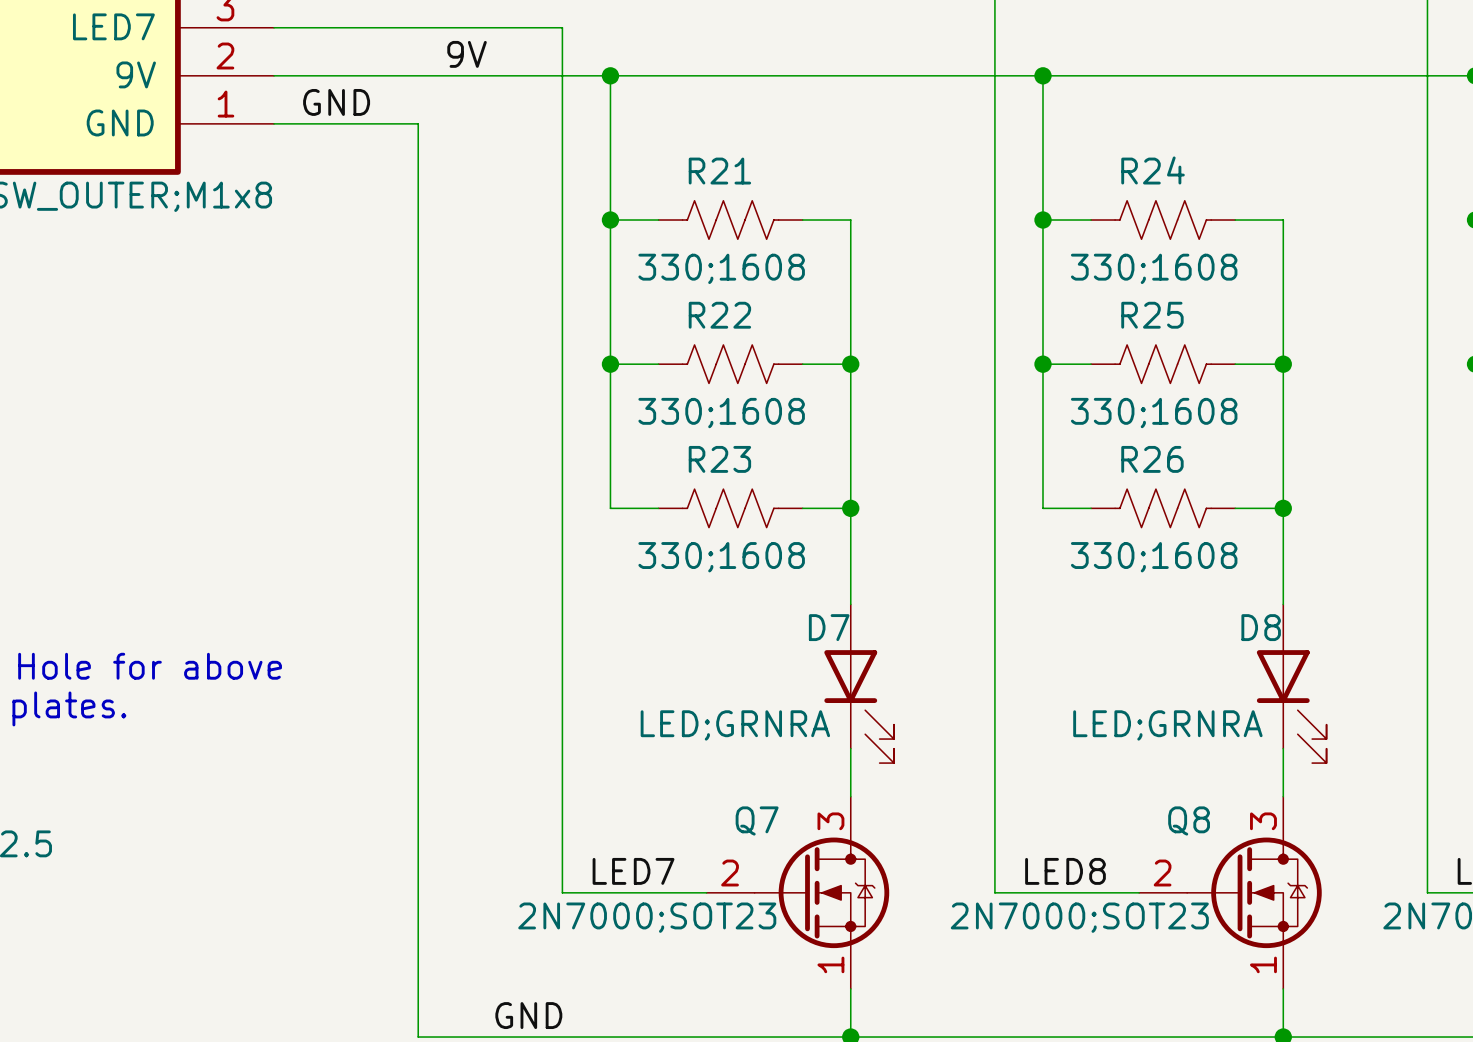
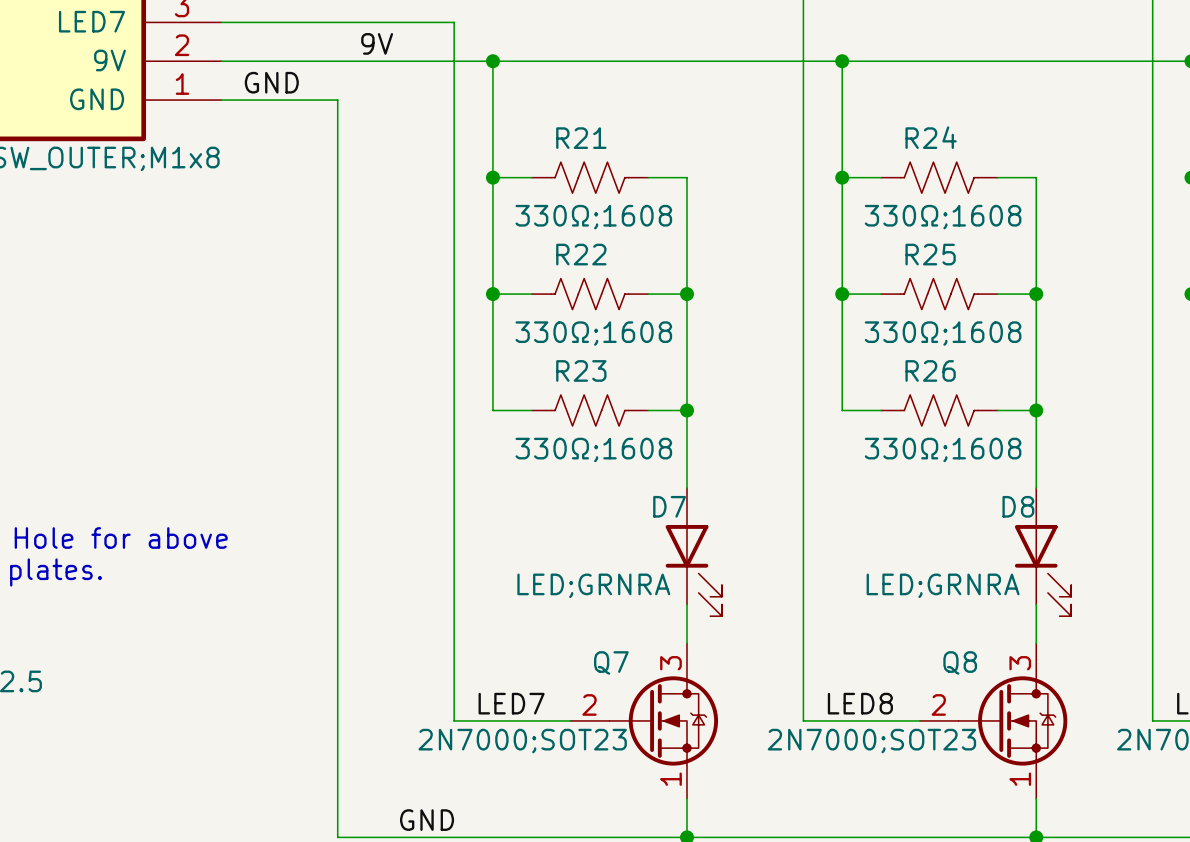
R21 value: 330;1608 (721, 268) -> 330Ω;1608 (593, 217)
R24 value: 330;1608 (1154, 268) -> 330Ω;1608 (943, 217)
R22 value: 330;1608 (721, 413) -> 330Ω;1608 (593, 333)
R25 value: 330;1608 (1154, 413) -> 330Ω;1608 (943, 333)
R23 value: 330;1608 (721, 557) -> 330Ω;1608 (593, 449)
R26 value: 330;1608 (1154, 557) -> 330Ω;1608 (943, 449)

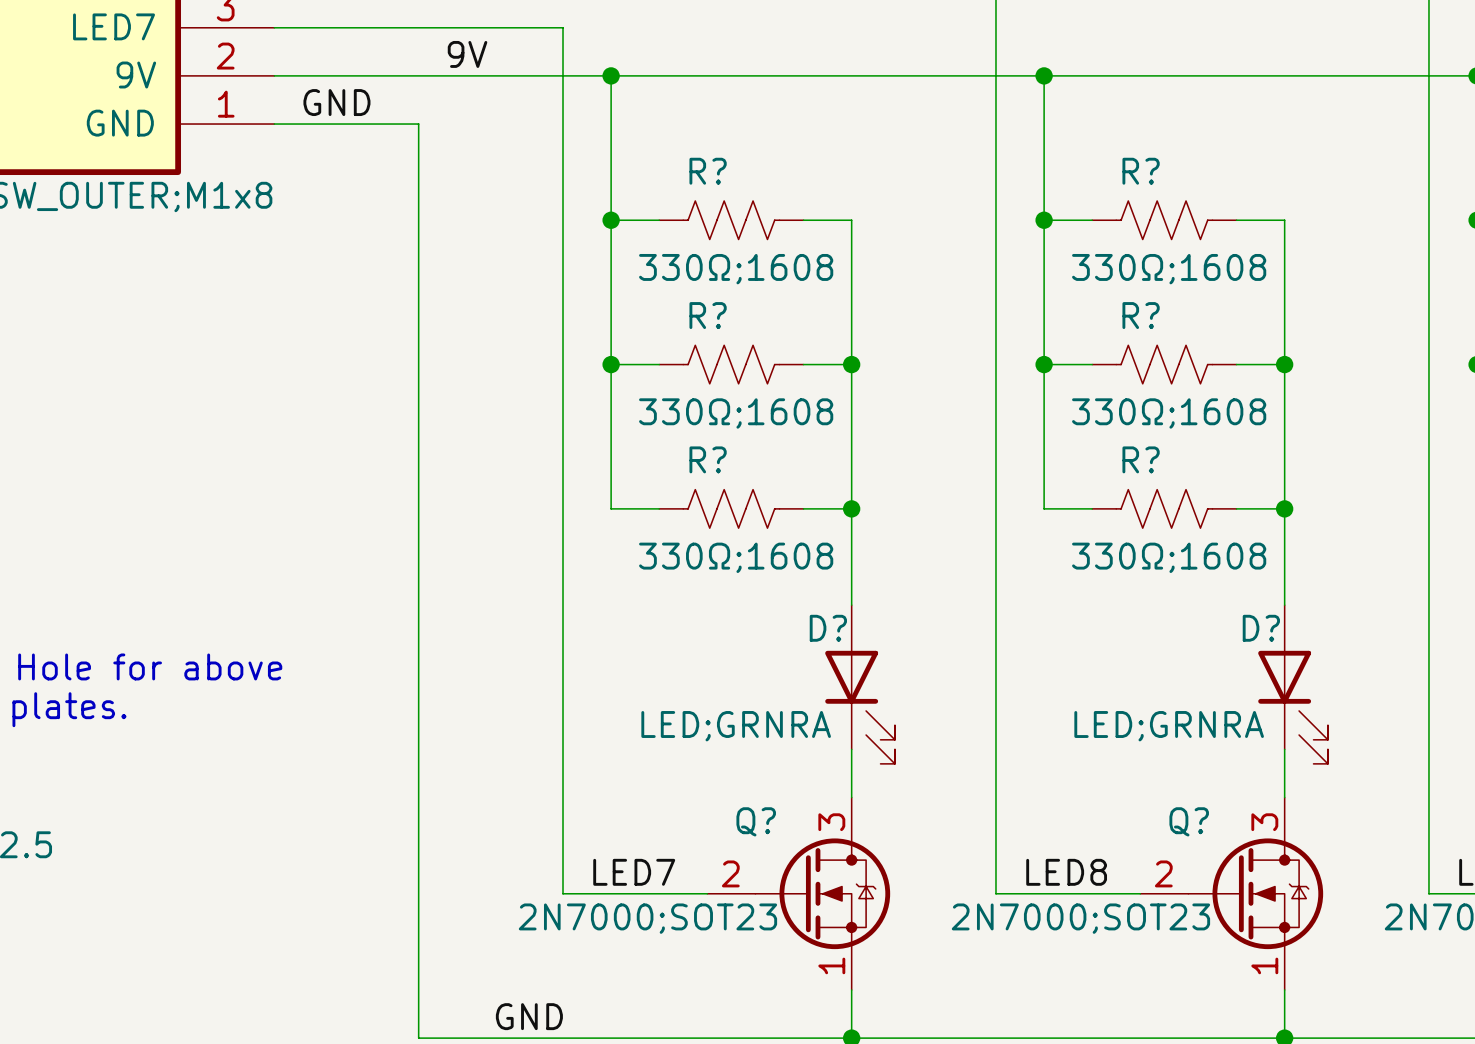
R24 name: R24 (931, 137) -> R? (1141, 171)
R21 name: R21 (581, 138) -> R? (708, 171)
R22 name: R22 (581, 254) -> R? (708, 315)
R25 name: R25 (930, 254) -> R? (1141, 315)
R23 name: R23 (581, 370) -> R? (708, 459)
R26 name: R26 (930, 370) -> R? (1141, 459)
D7 name: D7 (669, 506) -> D? (828, 628)
D8 name: D8 (1018, 506) -> D? (1261, 628)
Q7 name: Q7 (611, 662) -> Q? (756, 821)
Q8 name: Q8 (960, 662) -> Q? (1189, 821)

